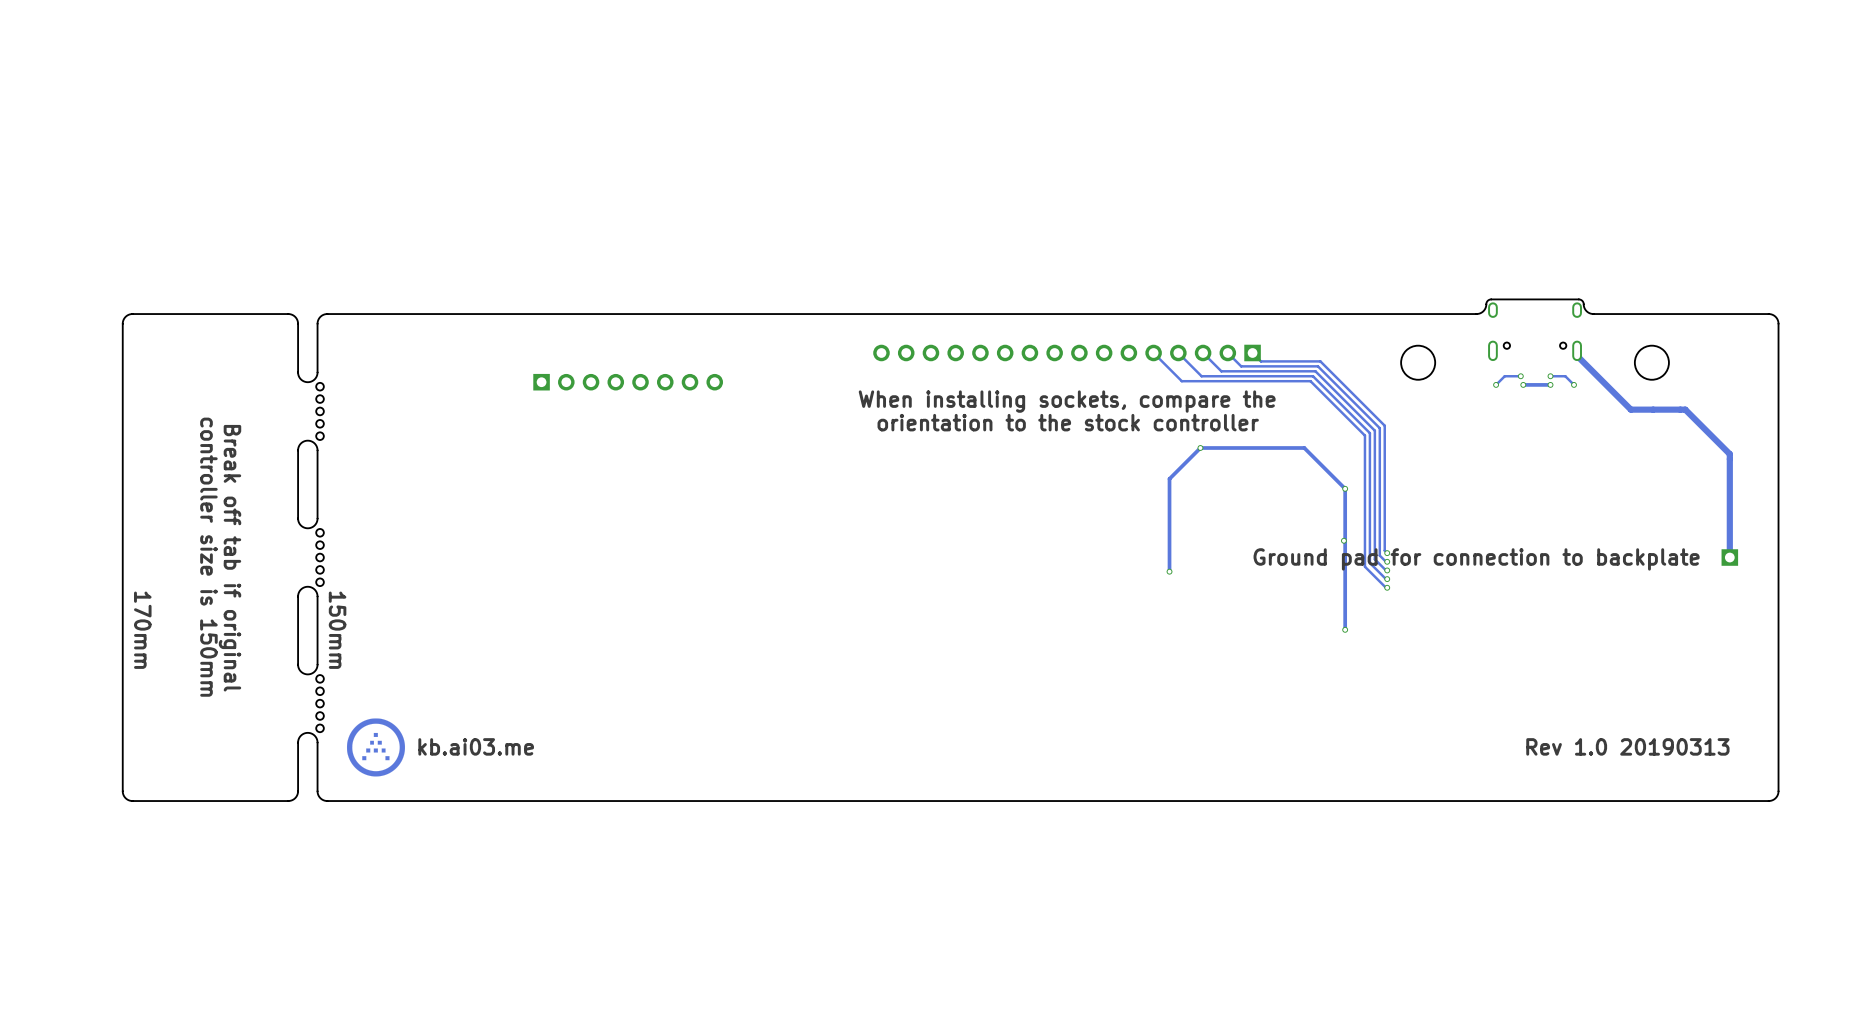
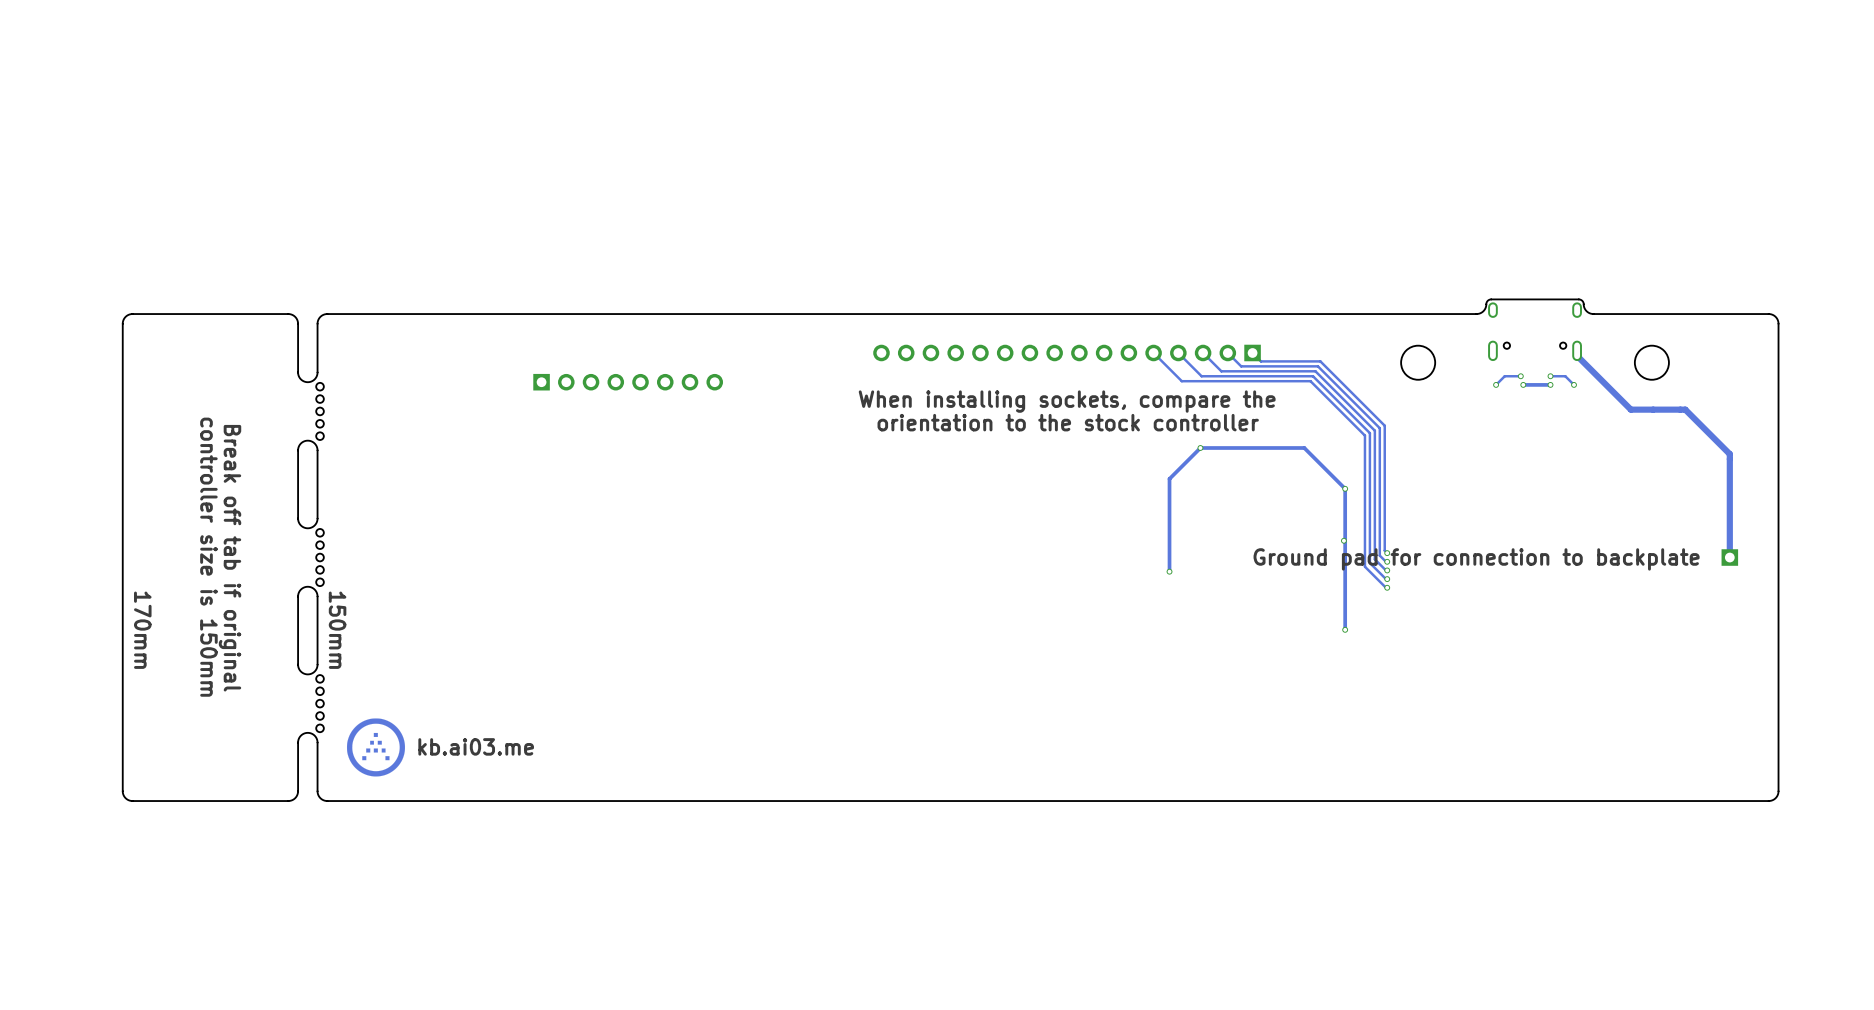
text: Rev 1.0 20190313 (1627, 746) -> none

